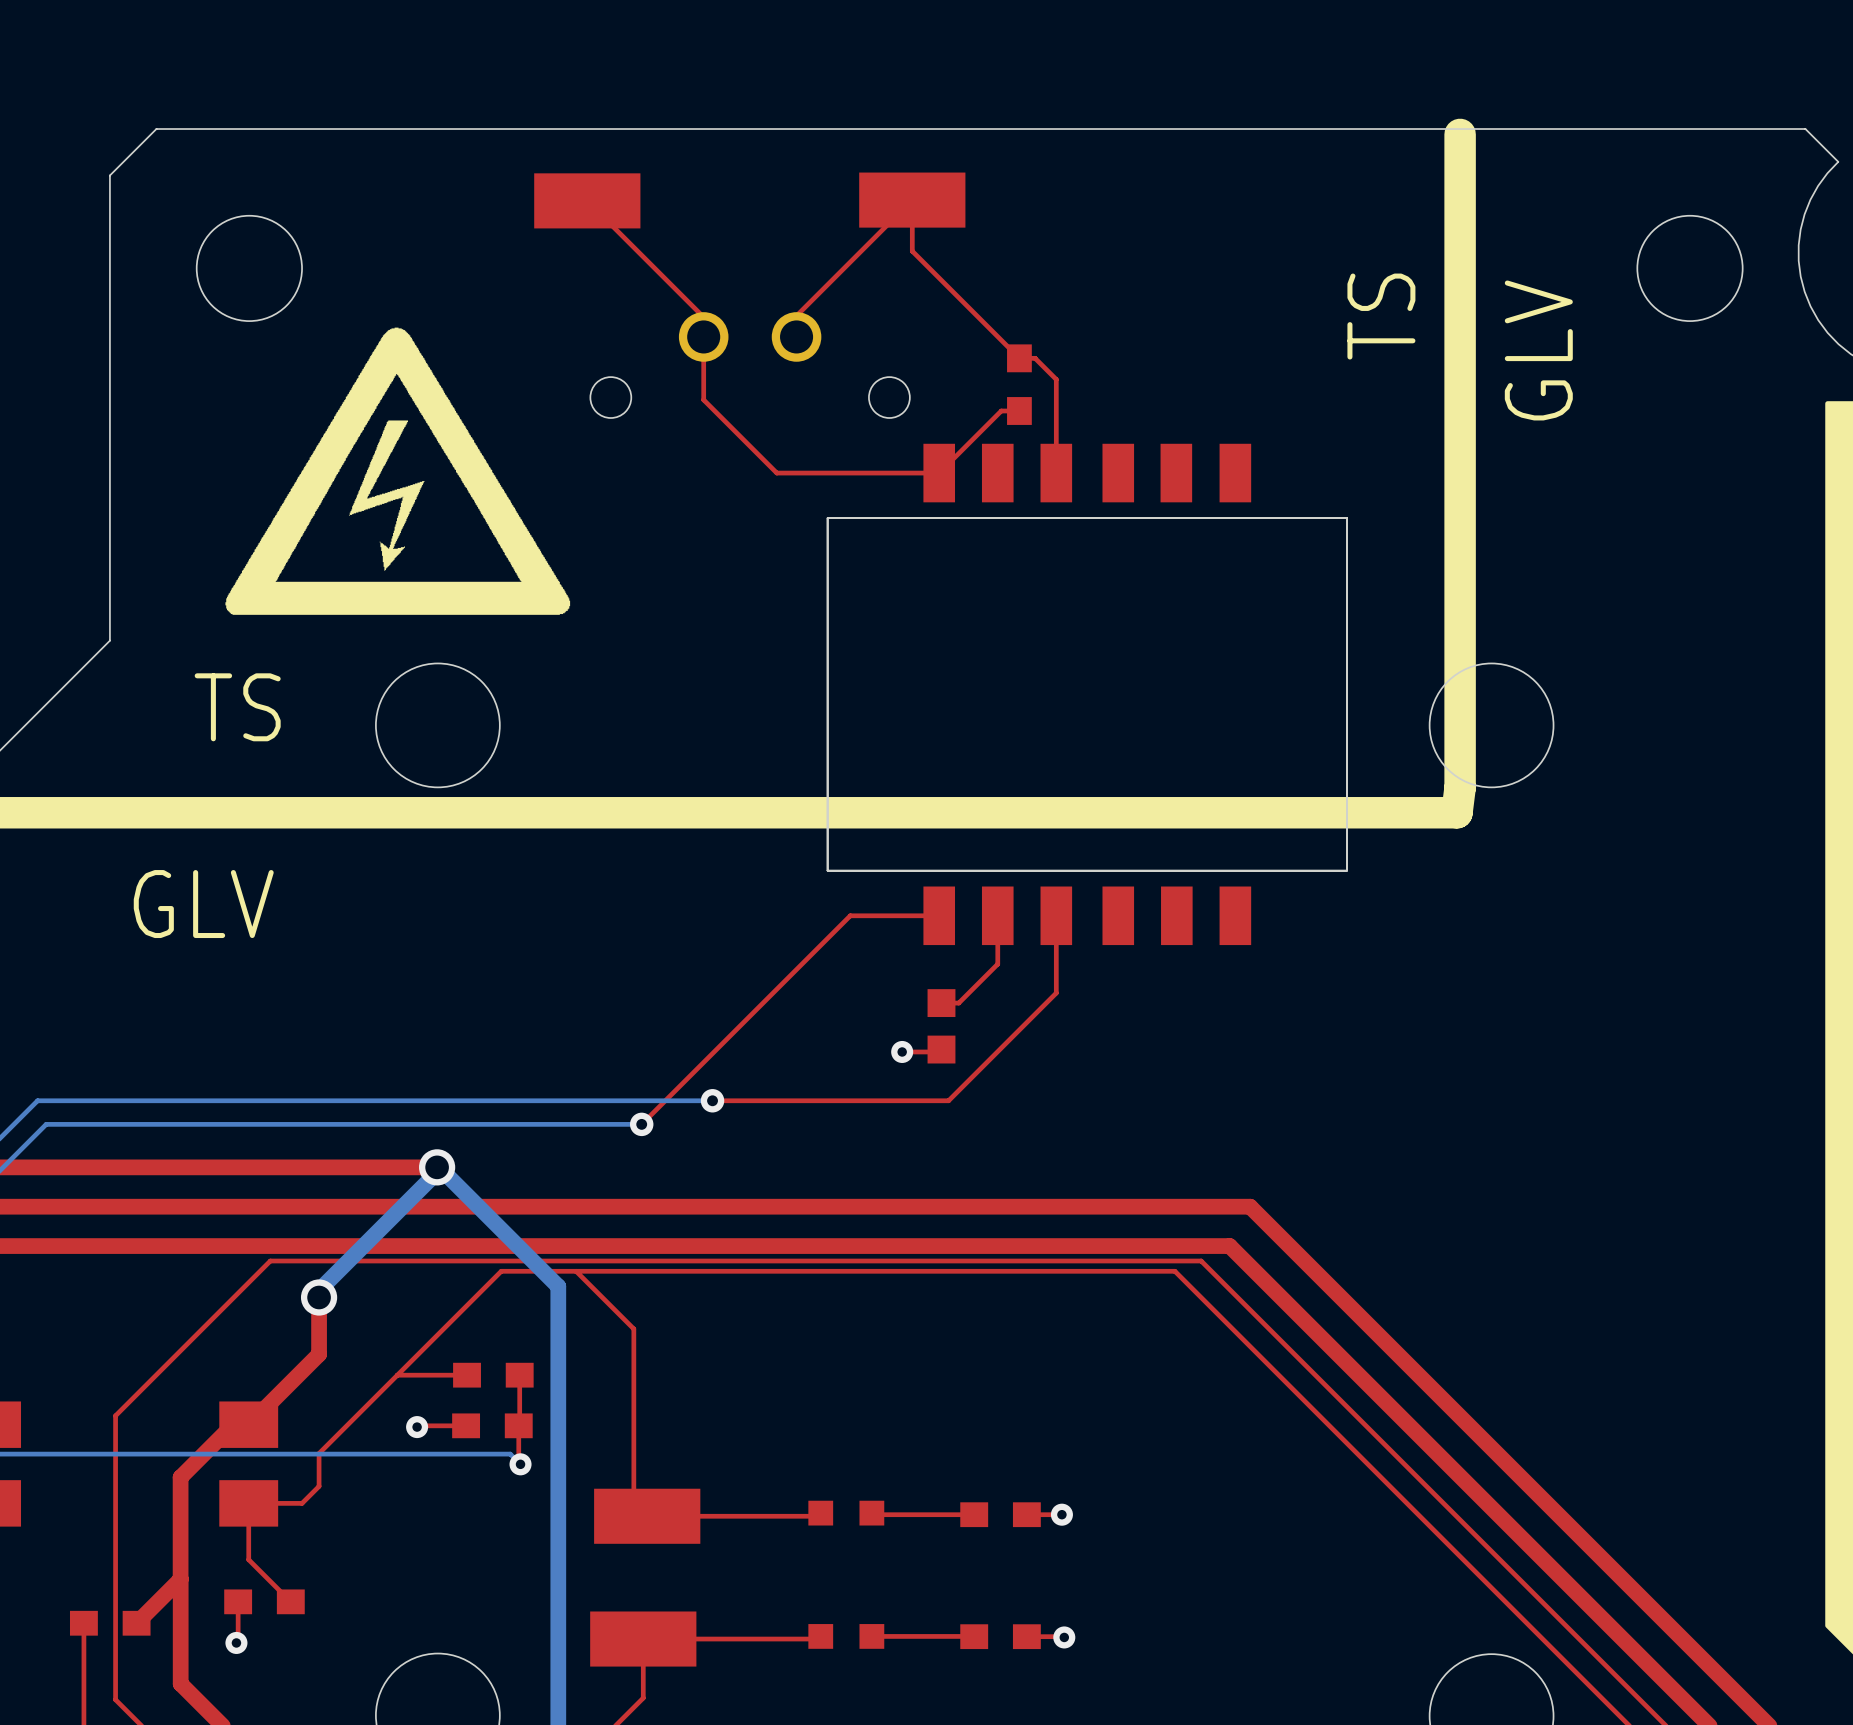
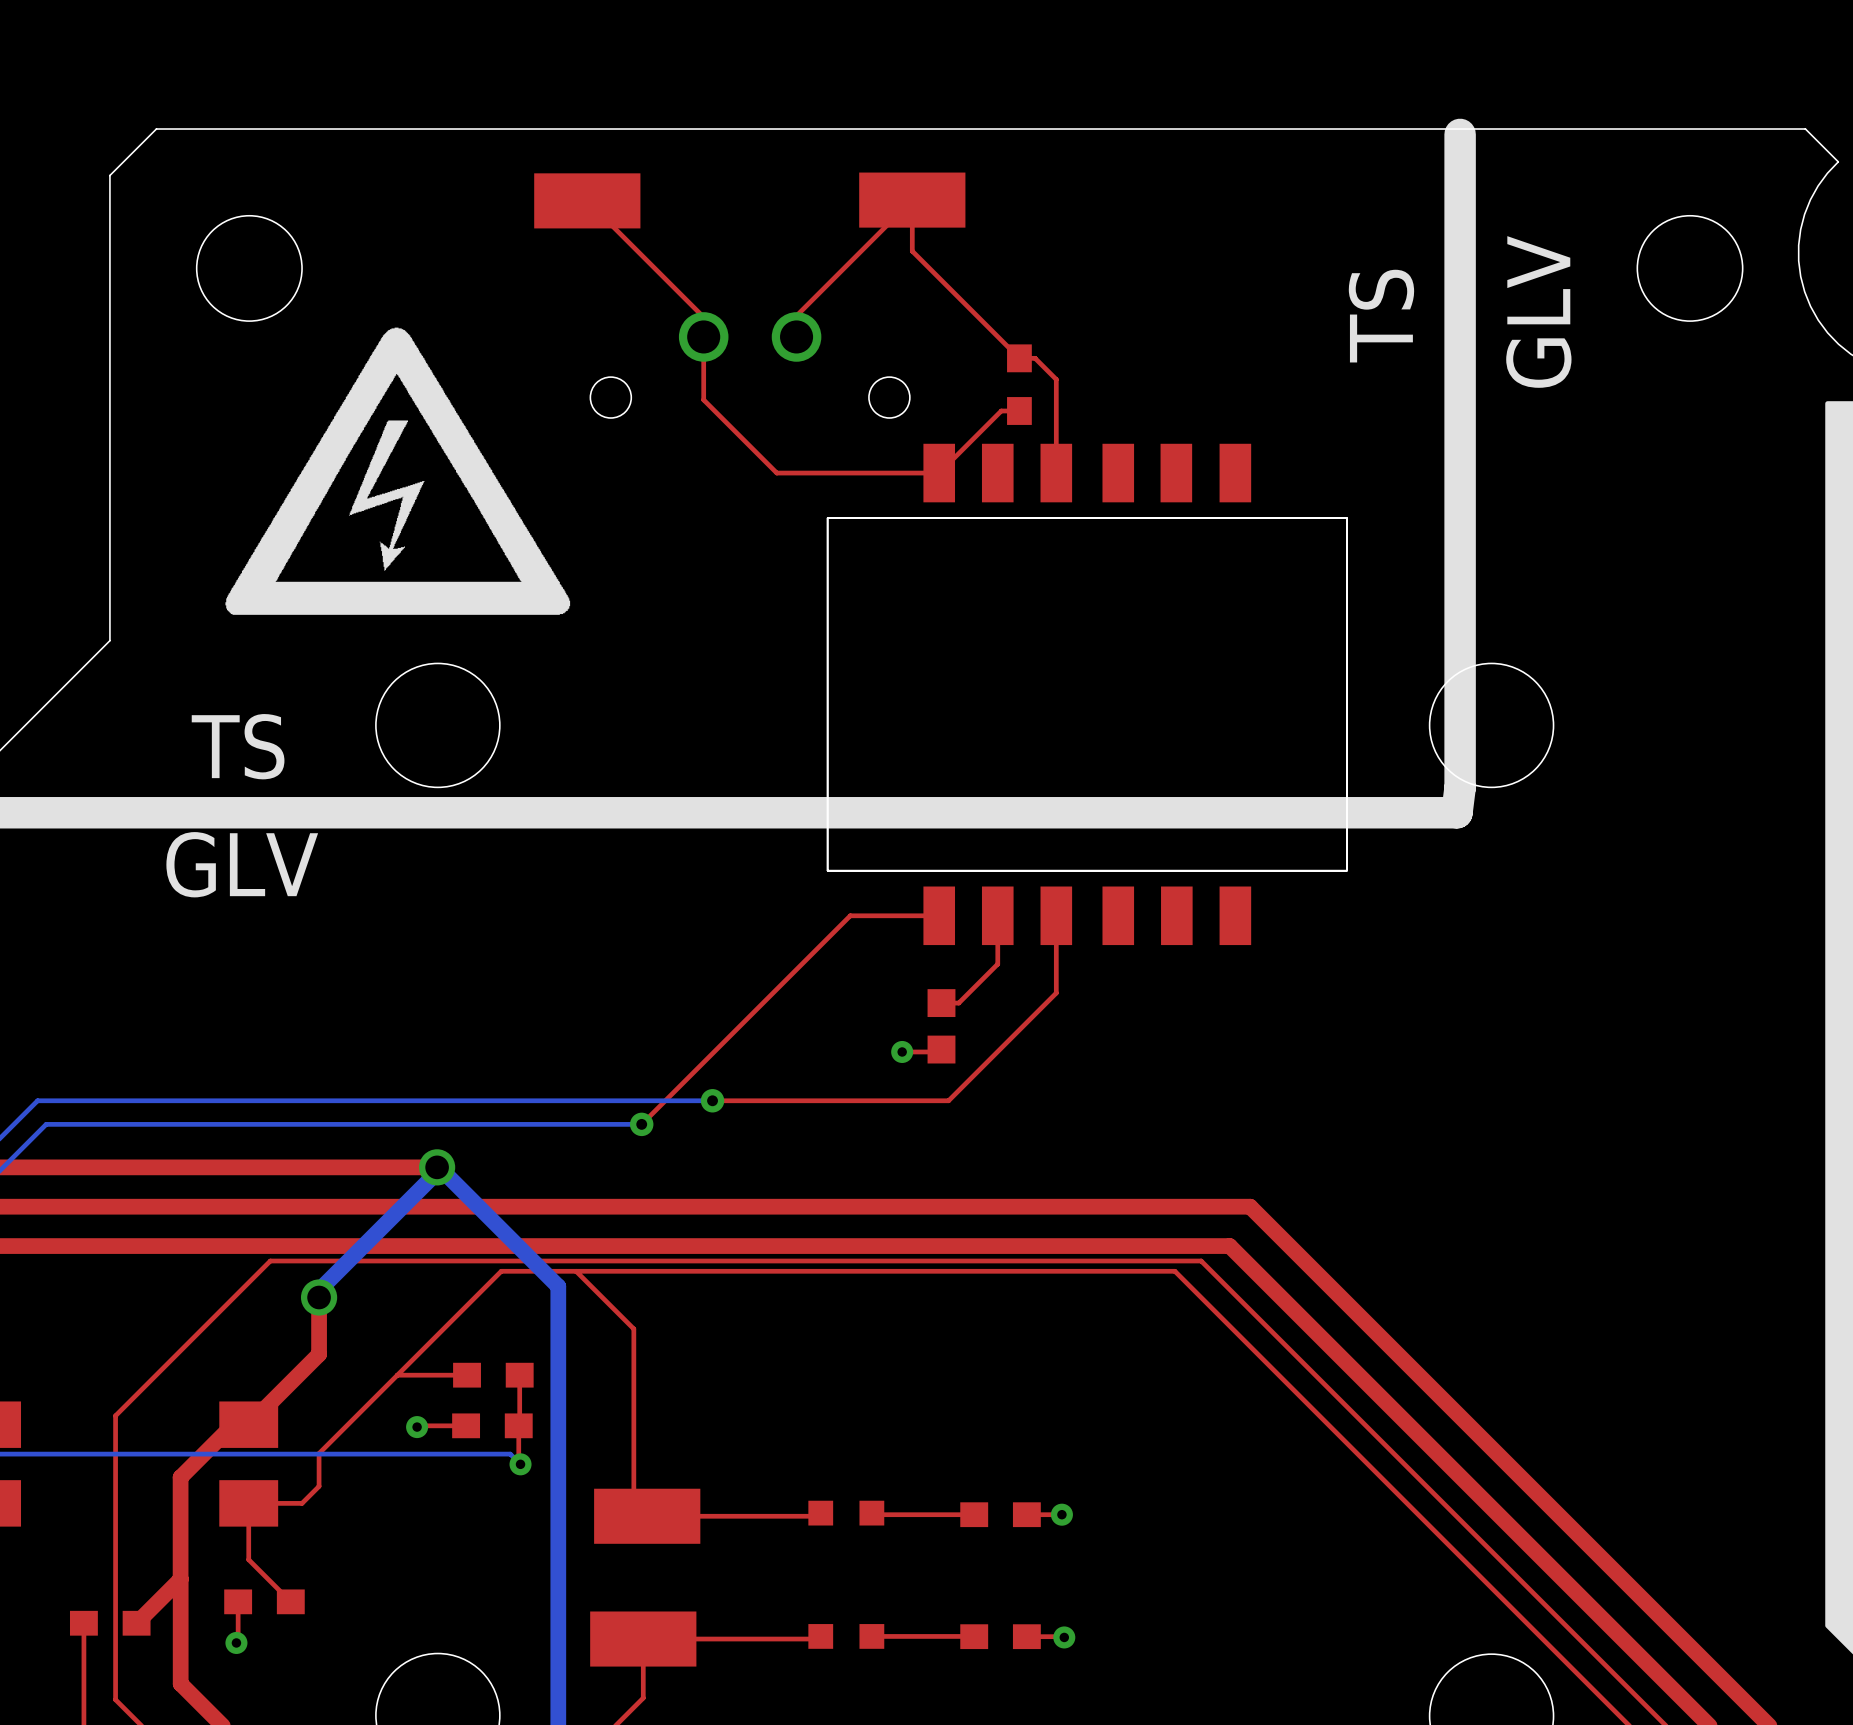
drawing position: (1538, 350) -> (1538, 311)
drawing position: (237, 707) -> (238, 746)
drawing position: (203, 904) -> (242, 864)

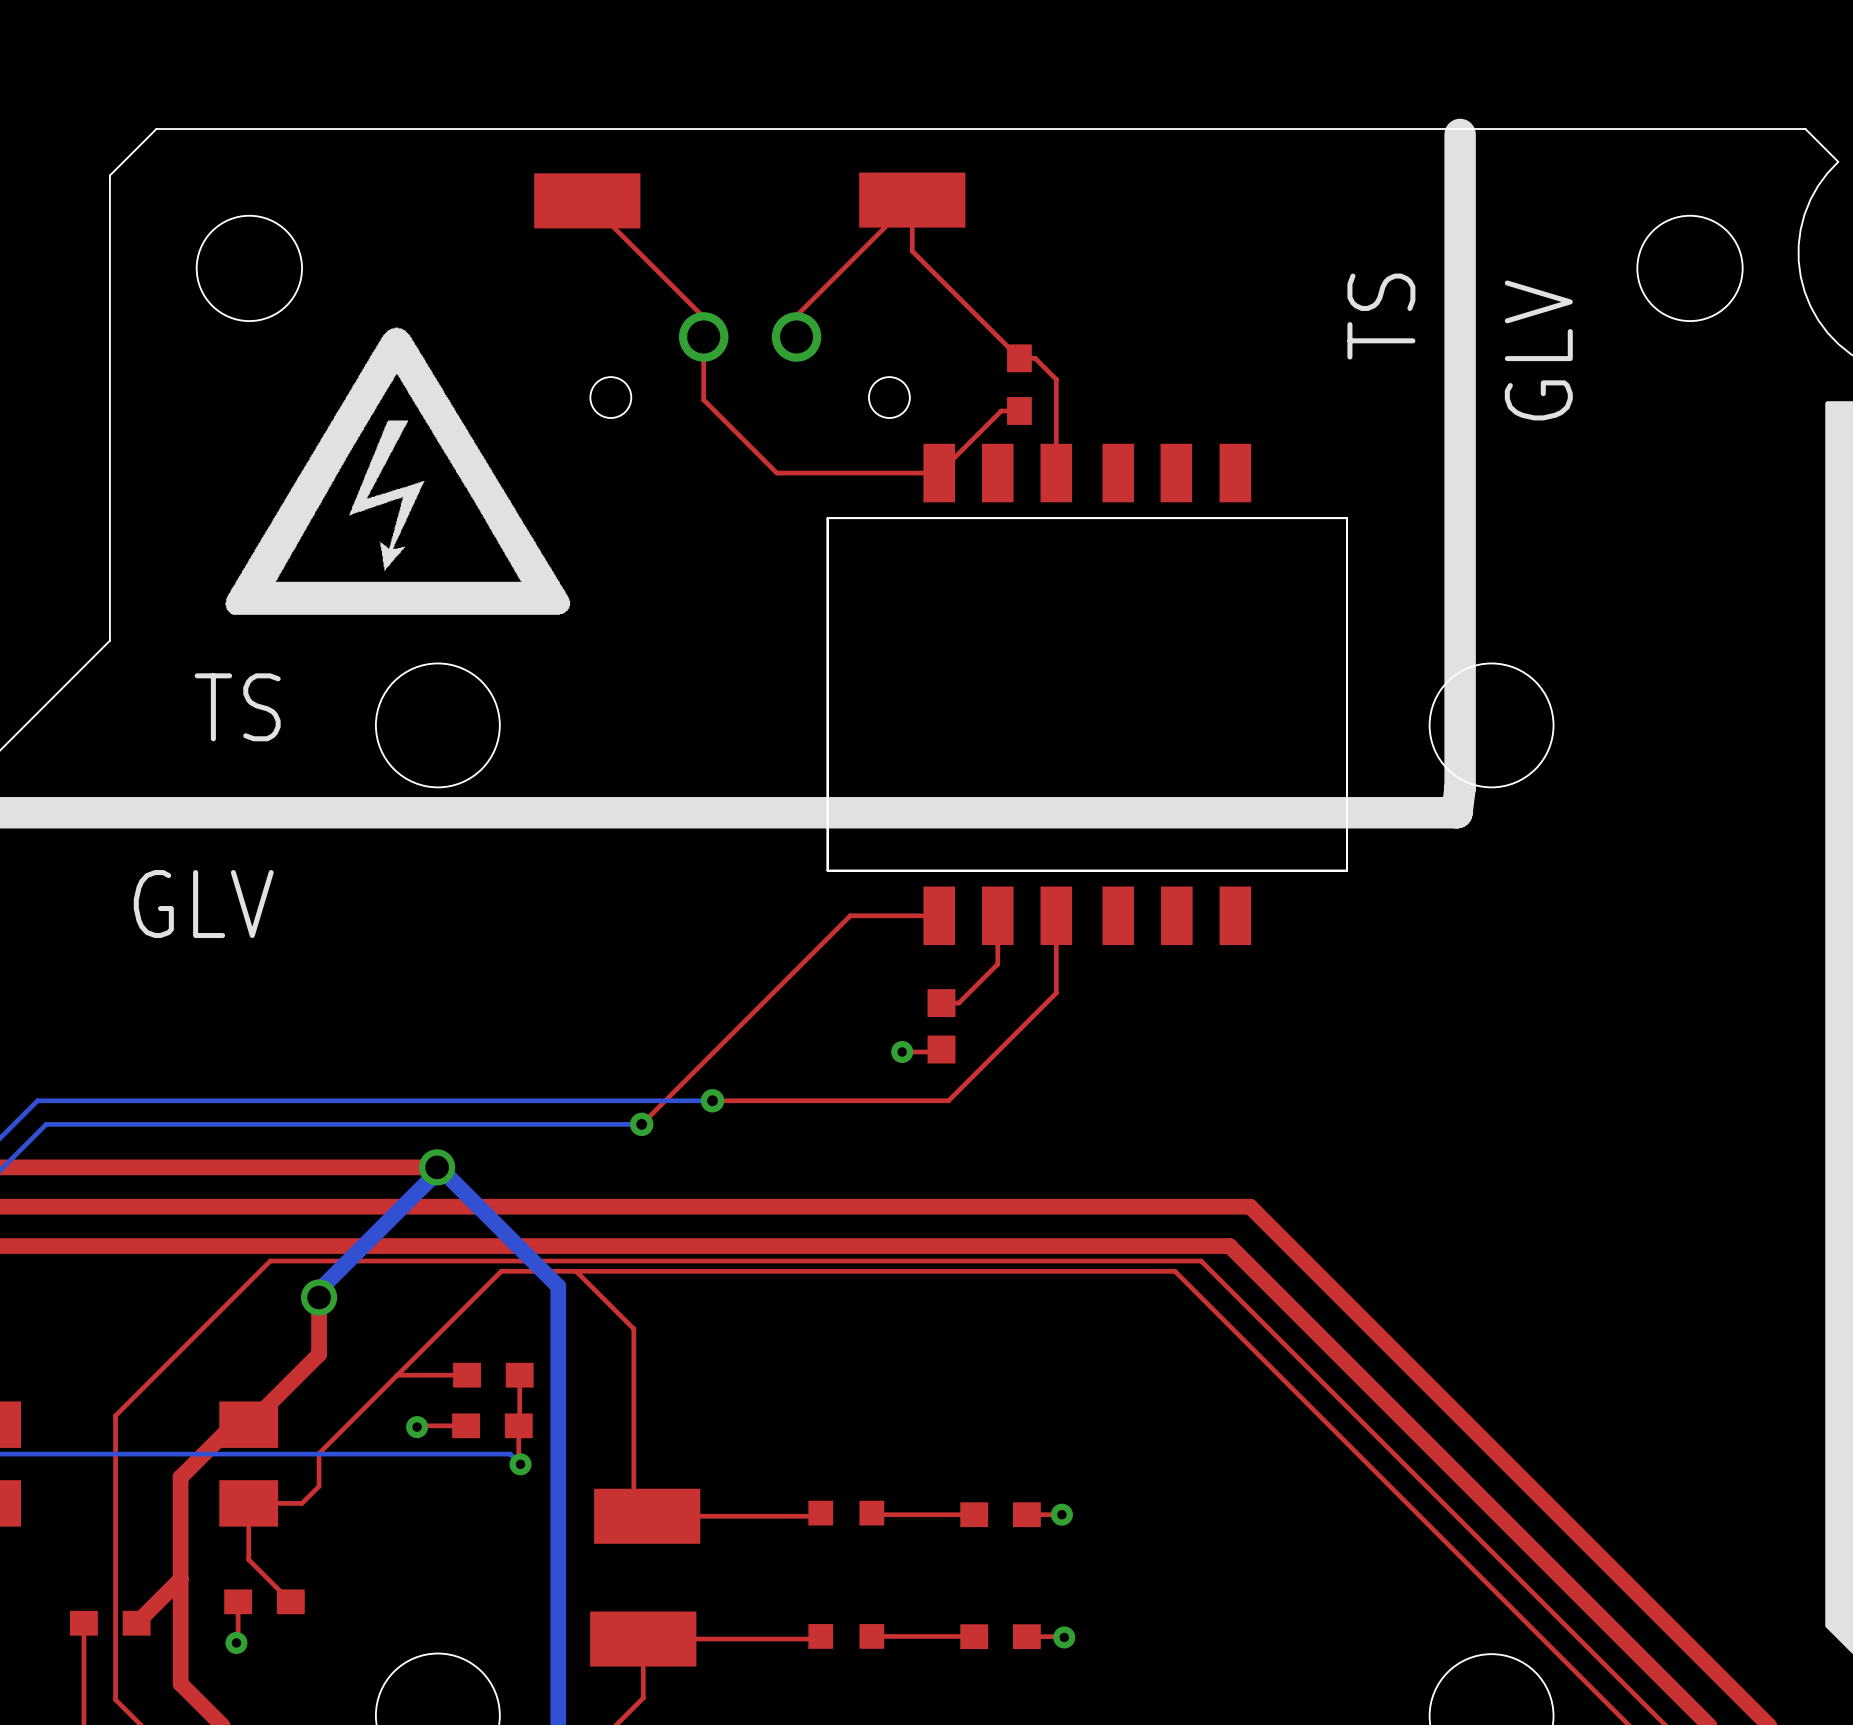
drawing position: (1538, 311) -> (1538, 350)
drawing position: (238, 746) -> (237, 707)
drawing position: (242, 864) -> (203, 904)

